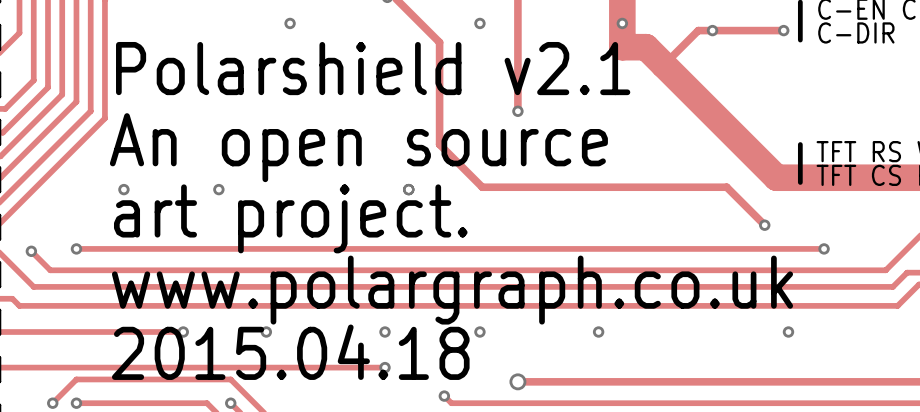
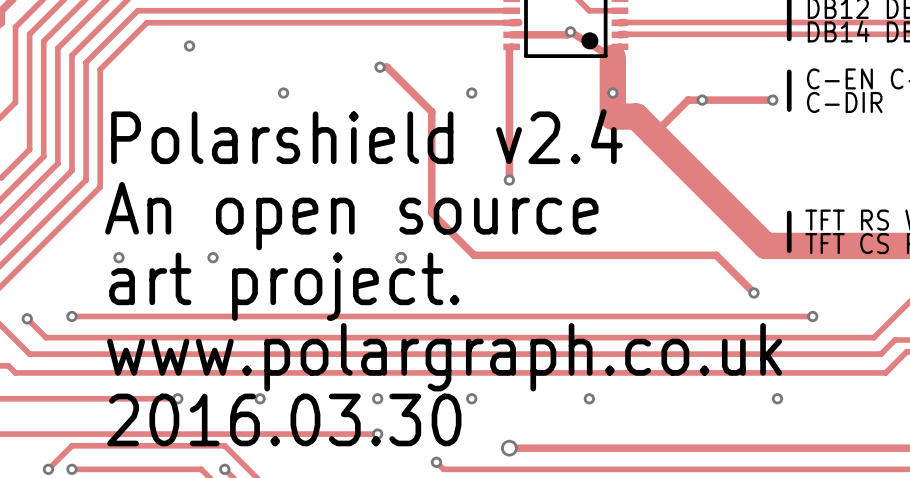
text: Polarshield v2.1 (373, 68) -> Polarshield v2.4 (366, 136)
text: 2015.04.18 (290, 352) -> 2016.03.30 (284, 419)

